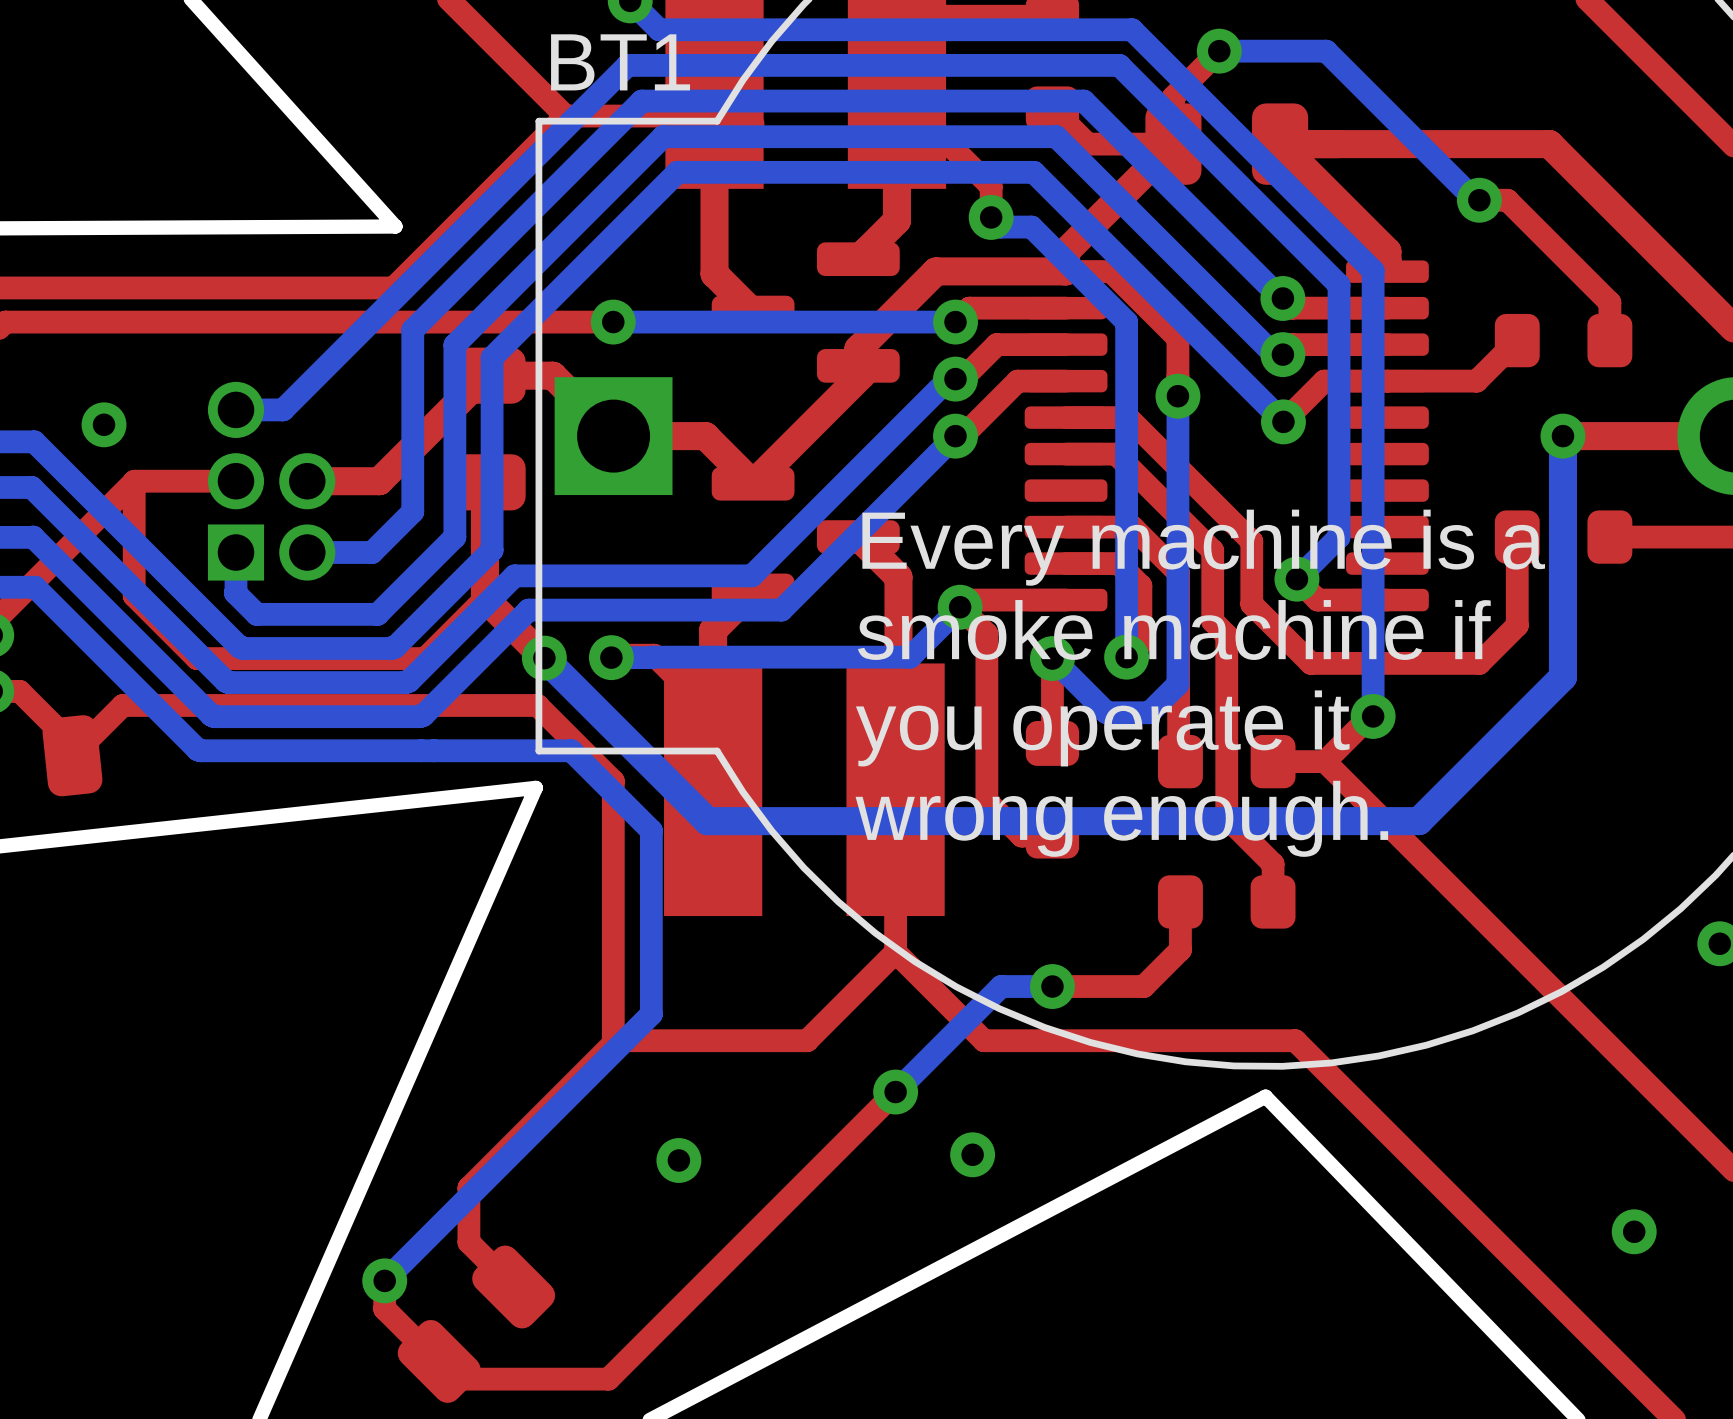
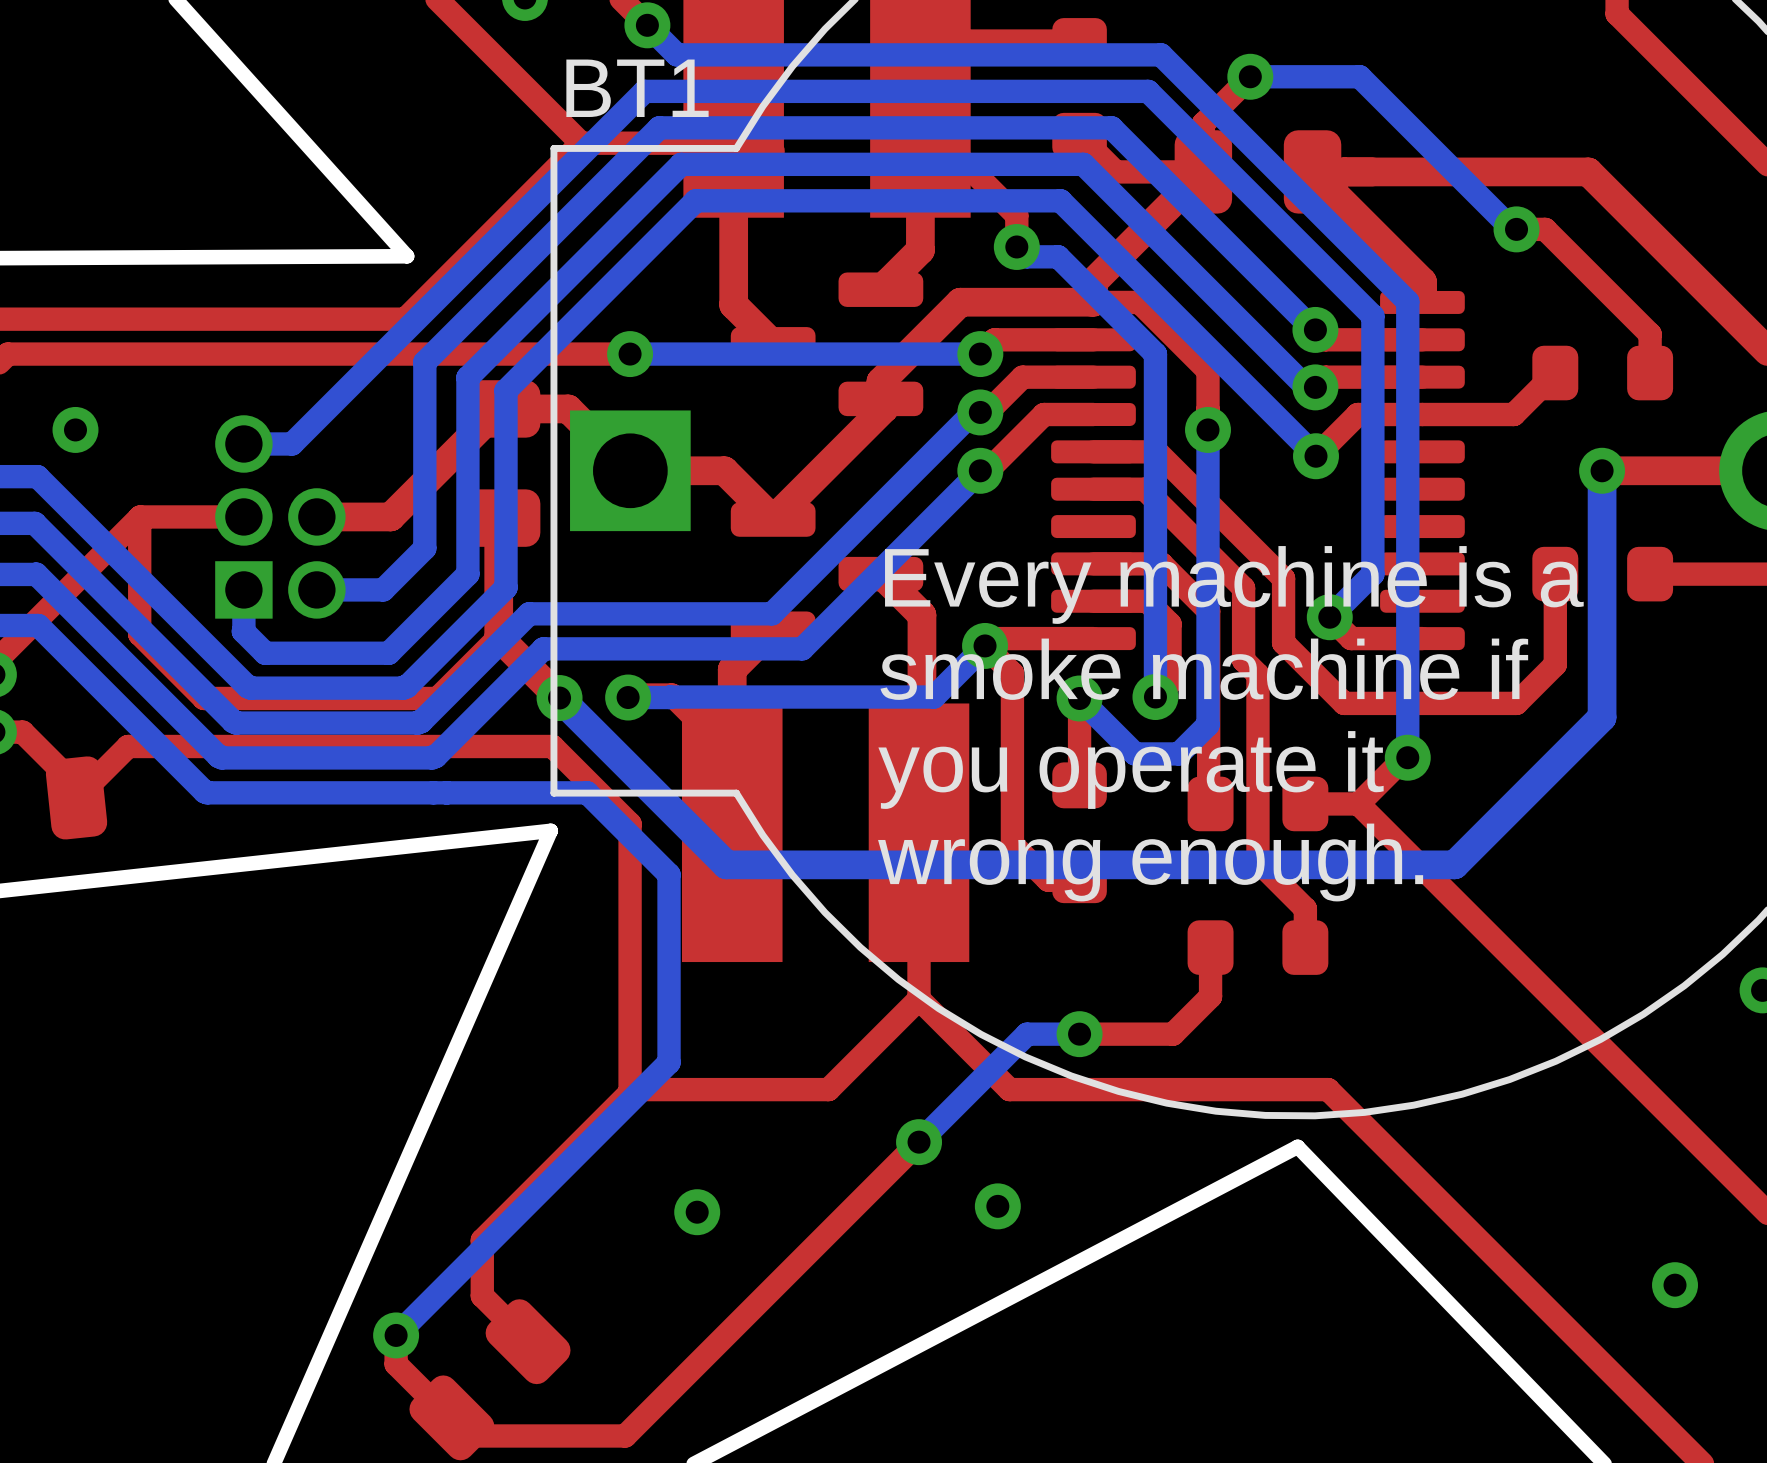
via position: (104, 424) -> (75, 429)

